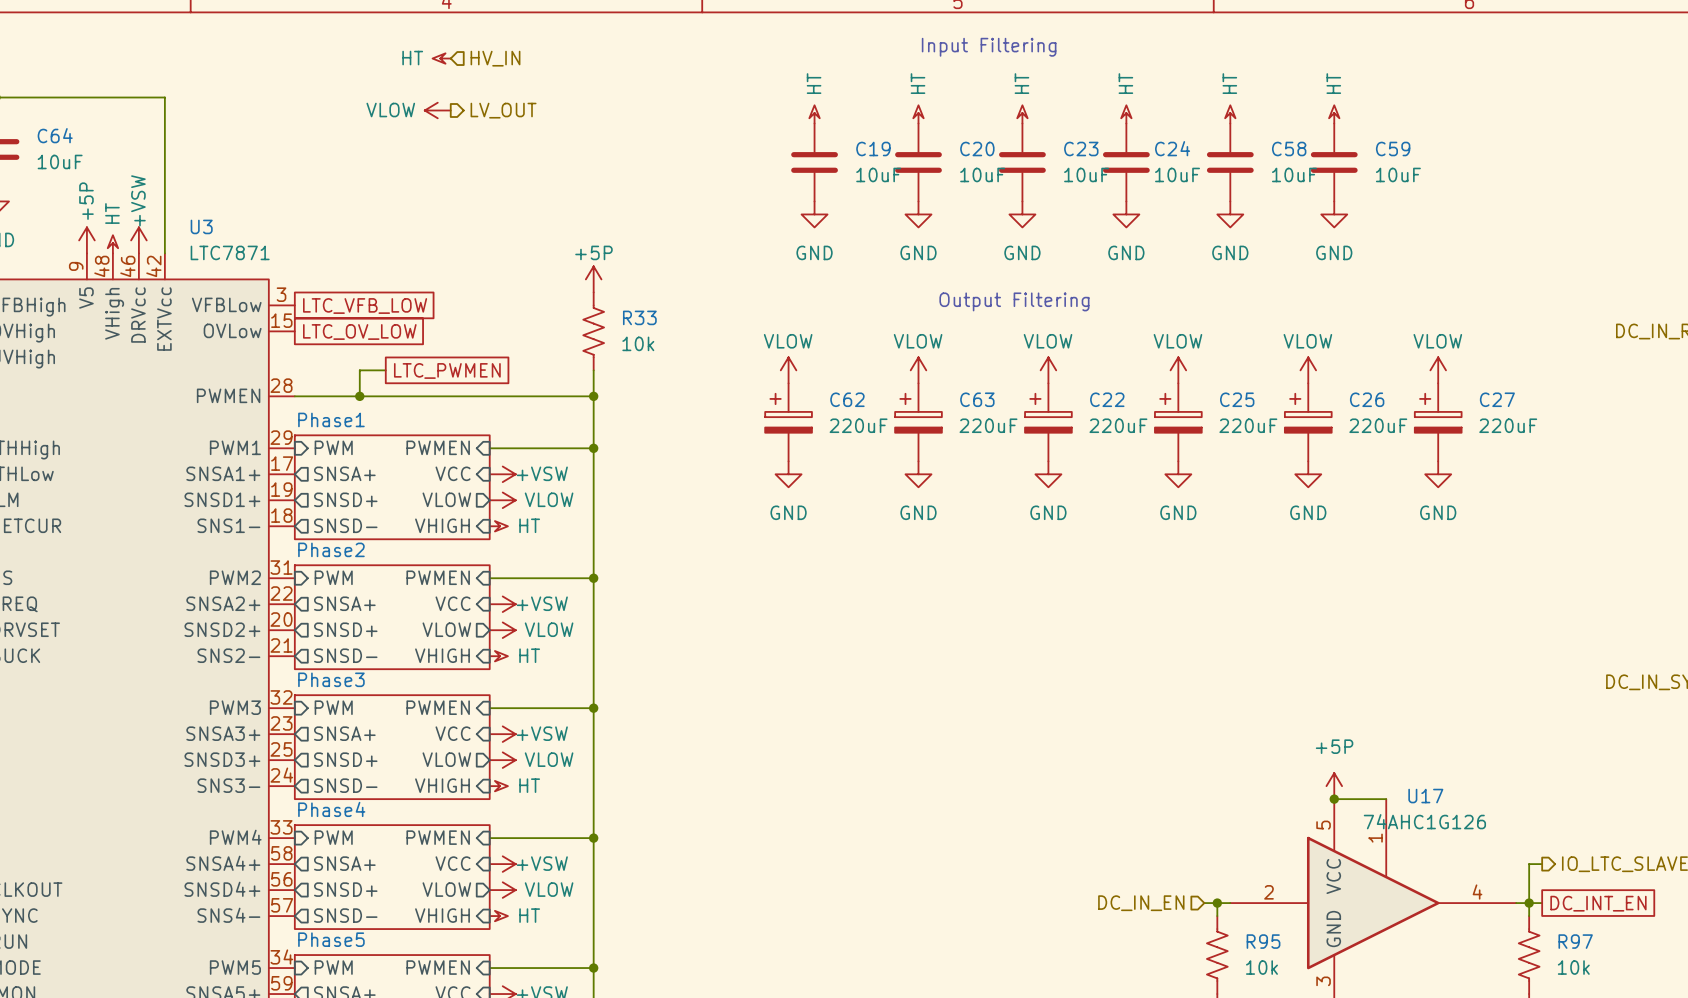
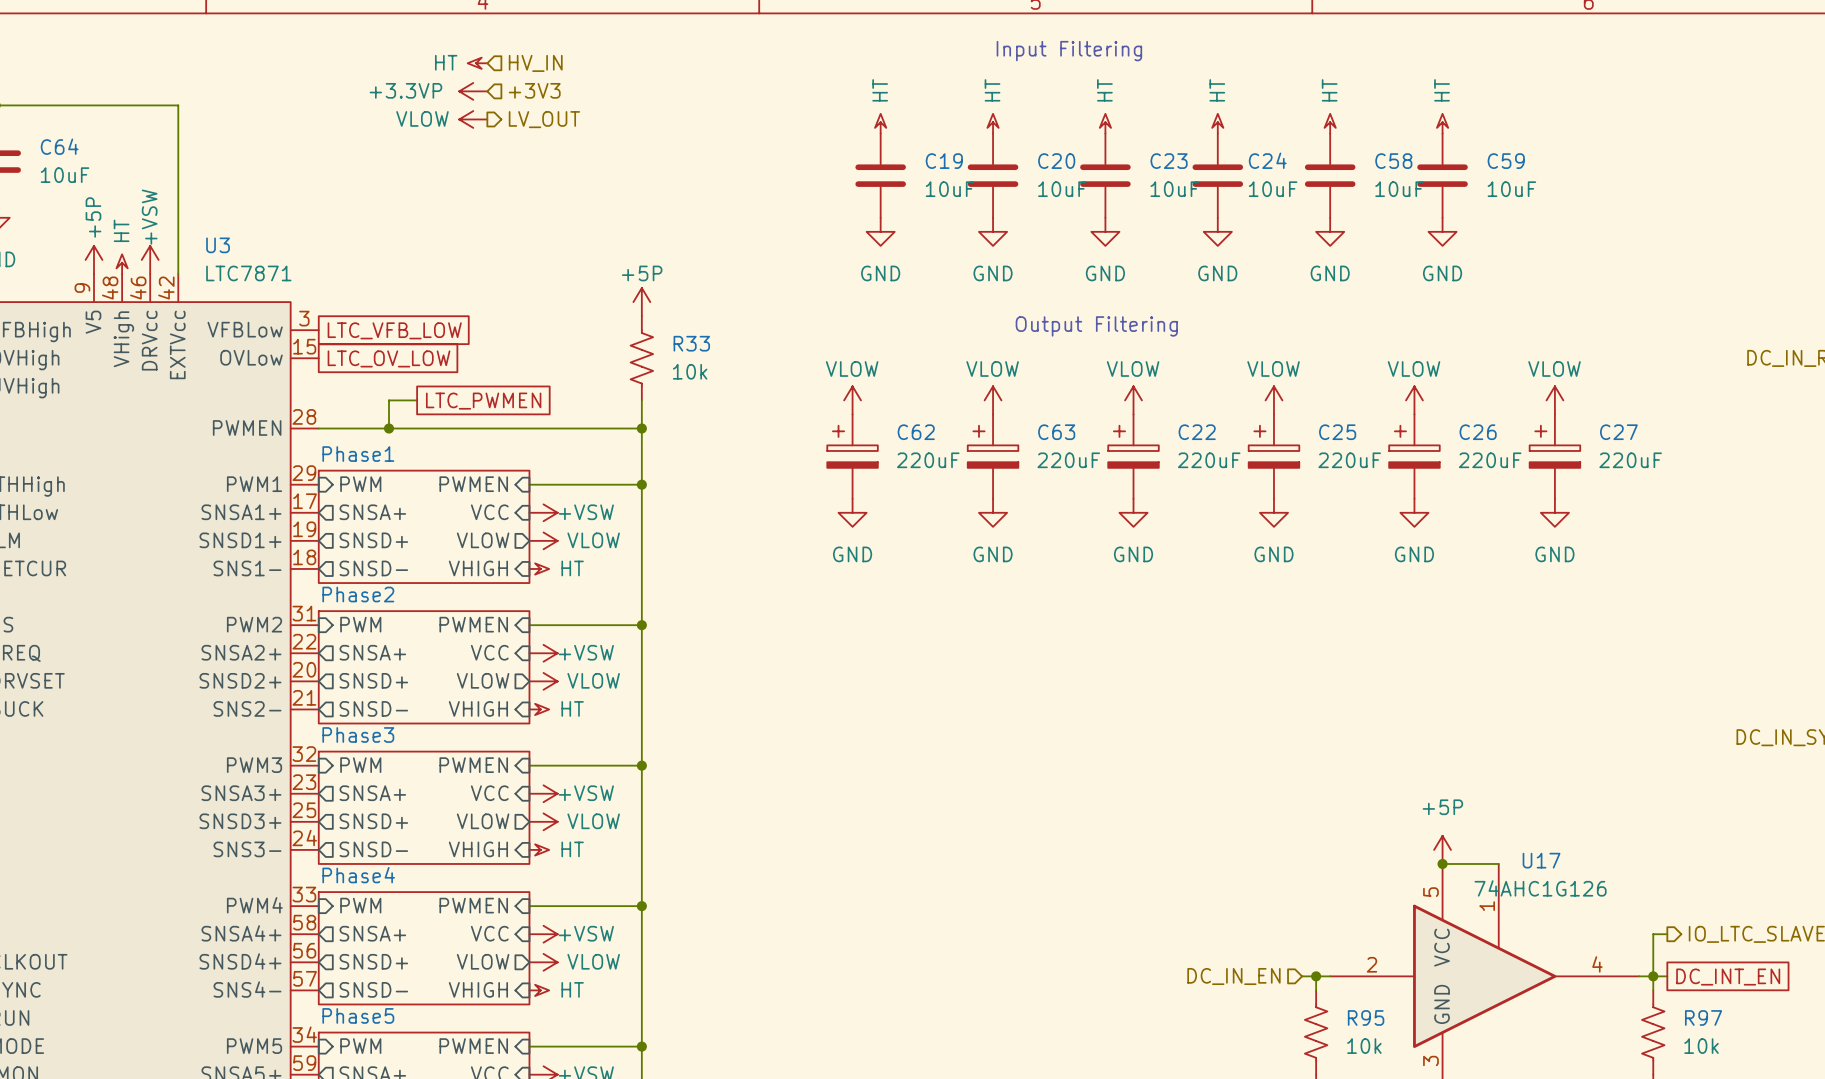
power symbol: none -> +3.3VP (473, 91)
hierarchical label: none -> +3V3 (534, 90)

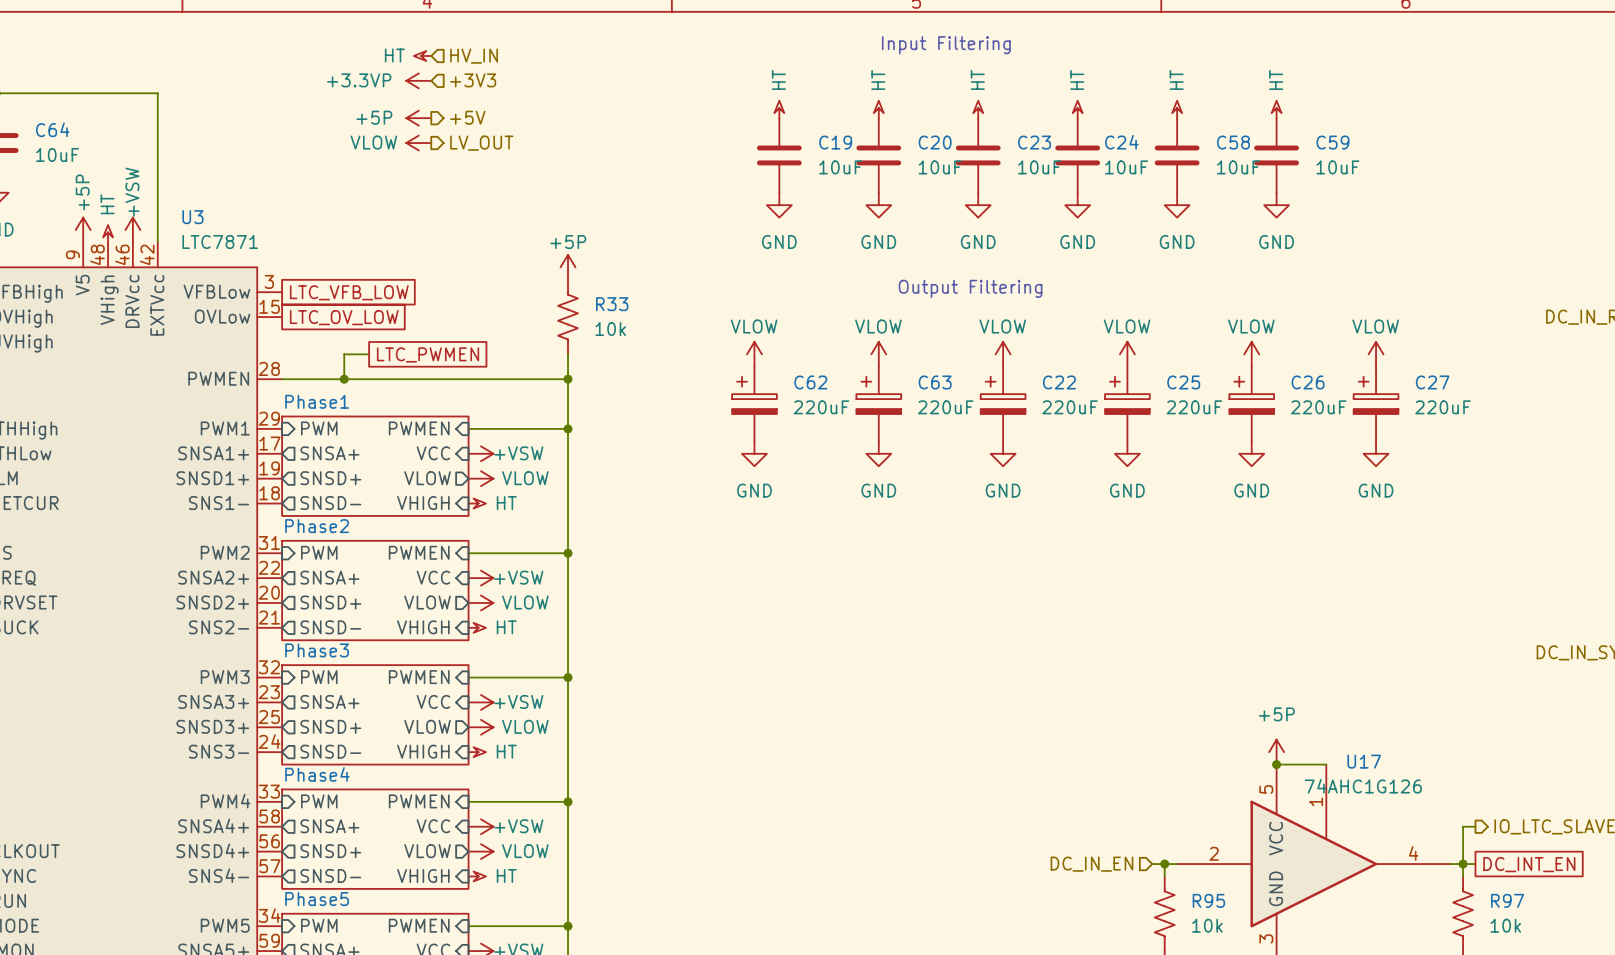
power symbol position: VLOW (473, 119) -> VLOW (418, 143)
hierarchical label position: LV_OUT (544, 119) -> LV_OUT (481, 143)
hierarchical label: none -> +5V (467, 117)
power symbol: none -> +5P (418, 118)

